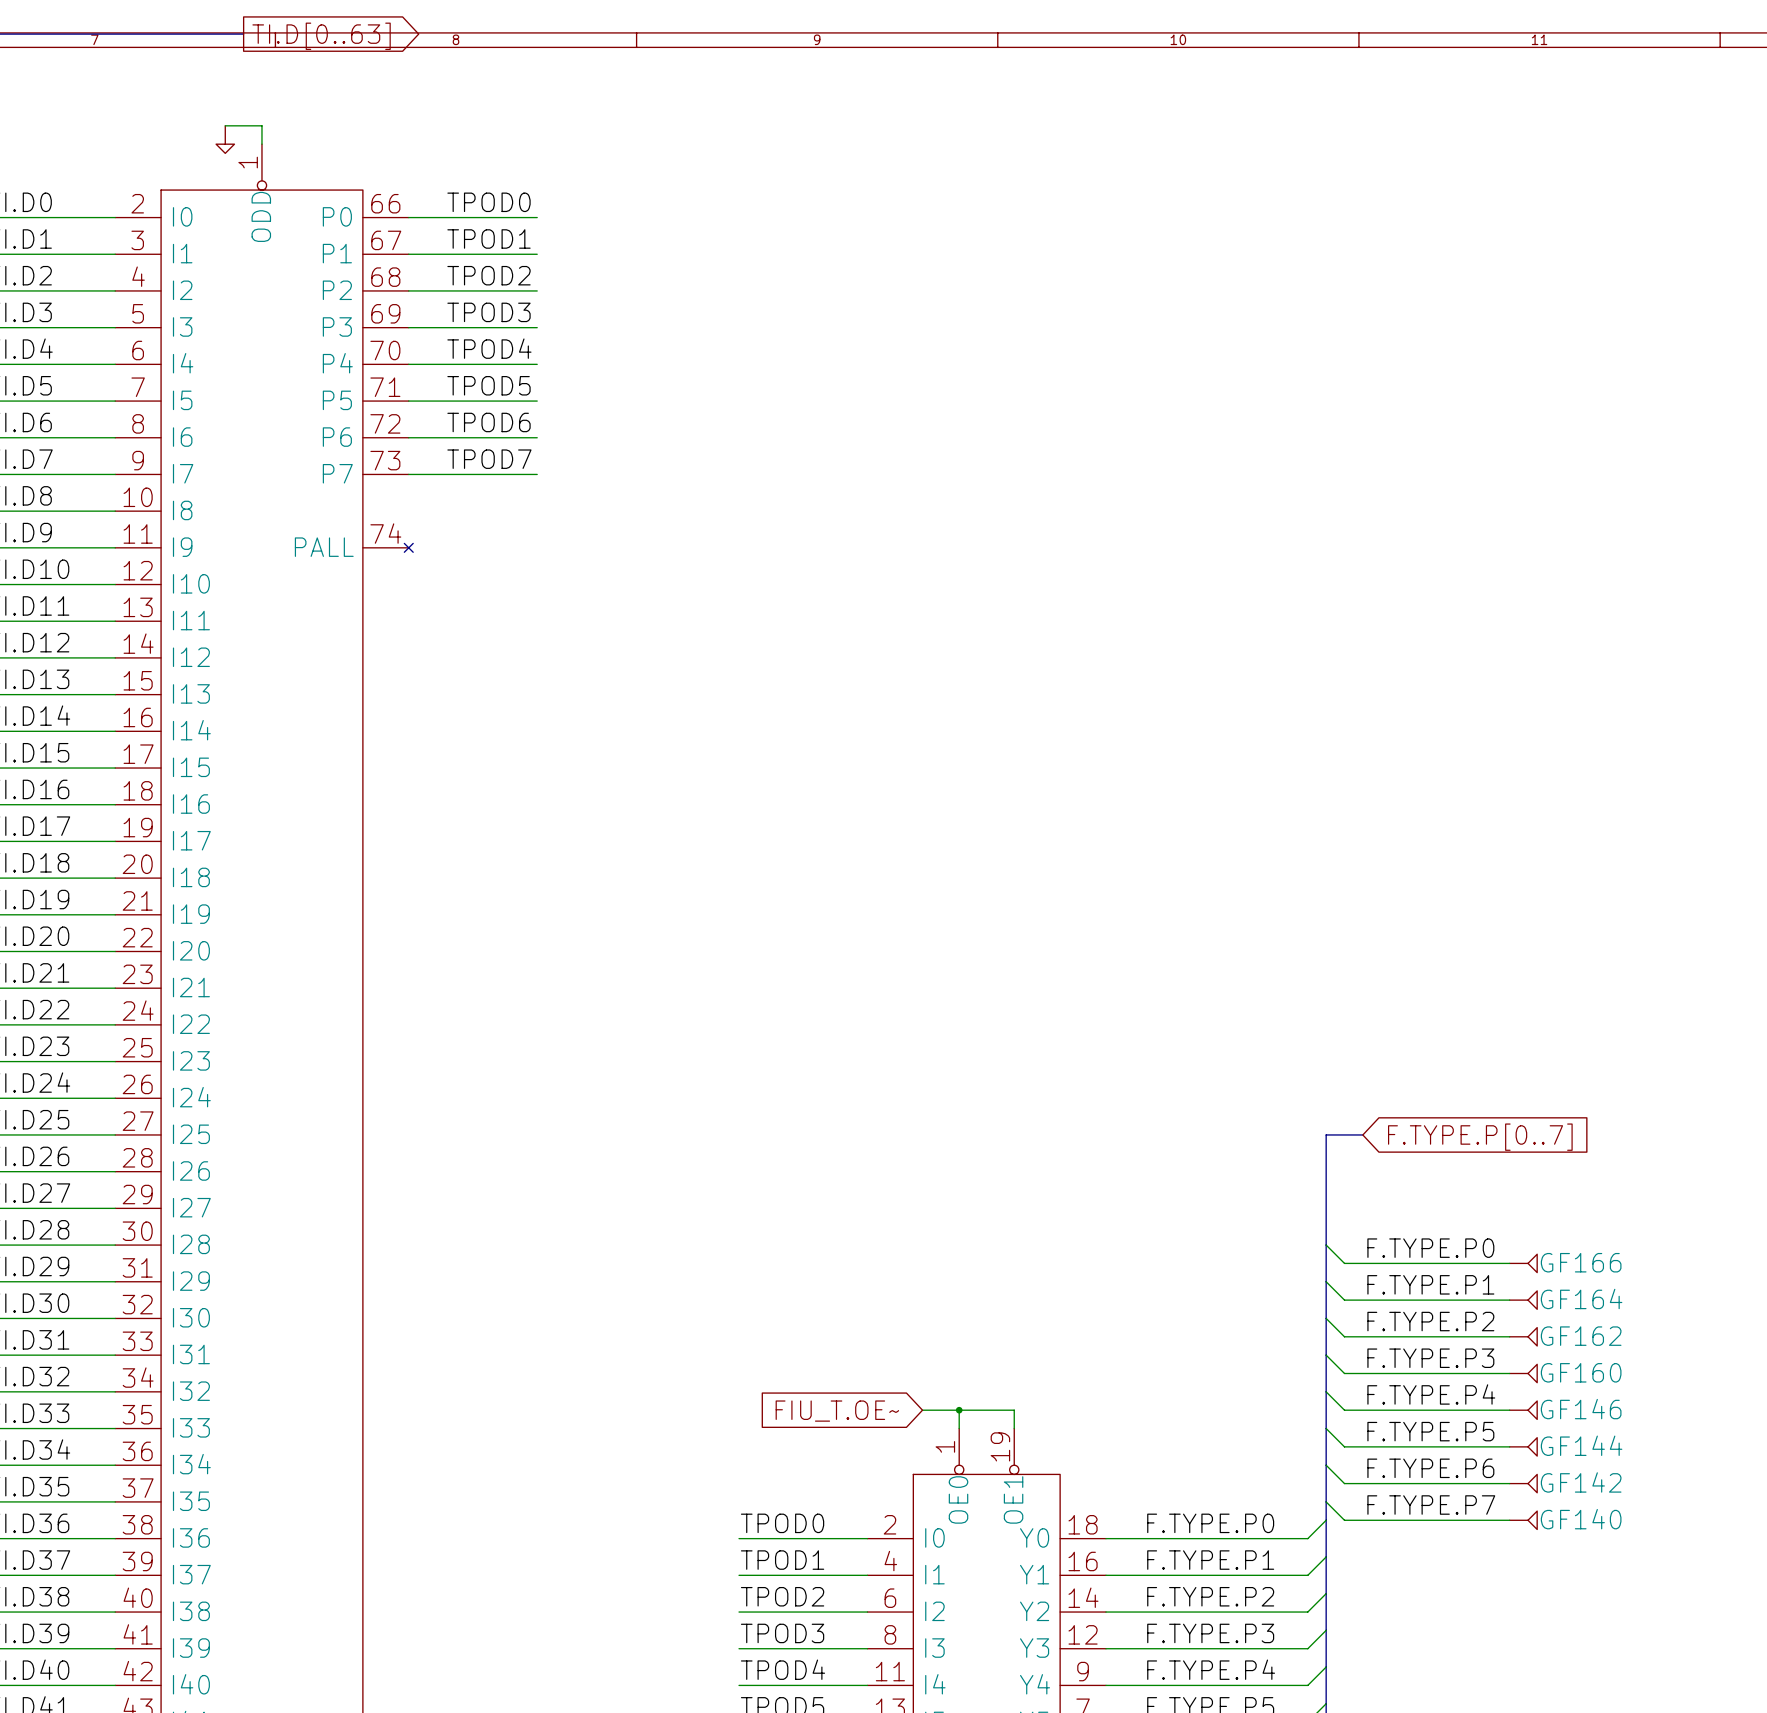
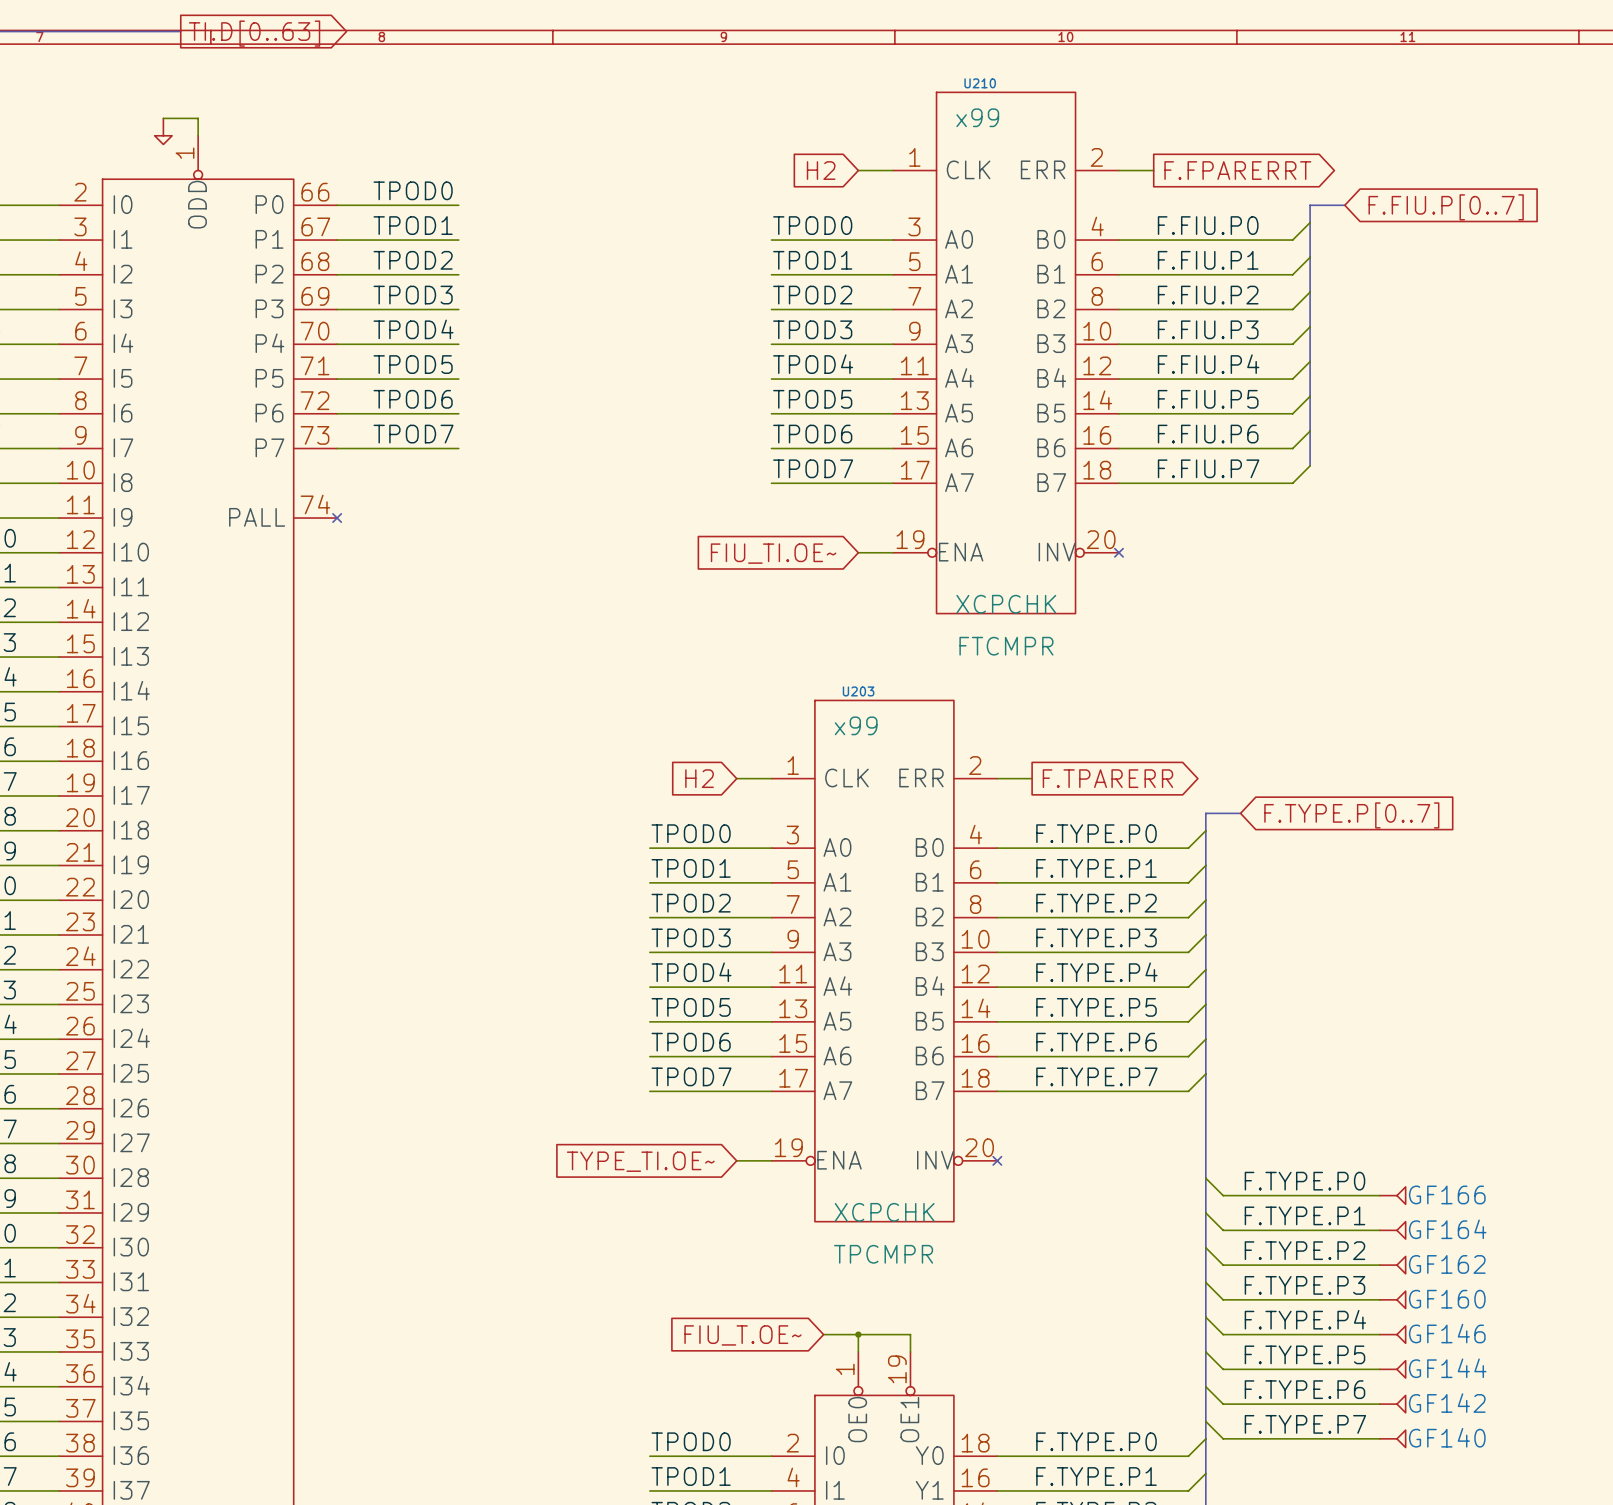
global label: none -> H2 (821, 170)
wire: none -> (858, 170) (893, 170)
wire: none -> (1118, 170) (1153, 170)
global label: none -> F.FPARERRT (1237, 170)
bus: none -> (1344, 205) (1310, 205) (1310, 465)
global label: none -> F.FIU.P[0..7] (1446, 207)
wire: none -> (1310, 222) (1292, 240) (1118, 240)
label: none -> TPOD0 (812, 225)
label: none -> F.FIU.P0 (1208, 225)
wire: none -> (771, 240) (893, 240)
wire: none -> (1310, 257) (1292, 274) (1118, 274)
label: none -> TPOD1 (812, 260)
label: none -> F.FIU.P1 (1208, 260)
wire: none -> (771, 274) (893, 274)
wire: none -> (1310, 292) (1292, 309) (1118, 309)
label: none -> TPOD2 (812, 295)
label: none -> F.FIU.P2 (1208, 295)
wire: none -> (771, 309) (893, 309)
wire: none -> (1310, 326) (1292, 344) (1118, 344)
label: none -> TPOD3 (812, 329)
label: none -> F.FIU.P3 (1208, 329)
wire: none -> (771, 344) (893, 344)
U210: none -> XCPCHK (1006, 352)
wire: none -> (1310, 361) (1292, 379) (1118, 379)
label: none -> TPOD4 (813, 364)
label: none -> F.FIU.P4 (1208, 364)
wire: none -> (771, 379) (893, 379)
wire: none -> (1310, 396) (1292, 413) (1118, 413)
label: none -> TPOD5 (812, 399)
label: none -> F.FIU.P5 (1208, 399)
wire: none -> (771, 413) (893, 413)
wire: none -> (1310, 431) (1292, 448) (1118, 448)
label: none -> TPOD6 (812, 434)
label: none -> F.FIU.P6 (1208, 434)
wire: none -> (771, 448) (893, 448)
wire: none -> (1310, 465) (1292, 483) (1118, 483)
label: none -> TPOD7 (813, 468)
label: none -> F.FIU.P7 (1208, 468)
wire: none -> (771, 483) (893, 483)
wire: none -> (858, 552) (893, 552)
no-connect mark: none -> (1118, 552)
global label: none -> FIU_TI.OE~ (773, 553)
global label: none -> H2 (699, 778)
wire: none -> (736, 778) (771, 778)
wire: none -> (997, 778) (1032, 778)
global label: none -> F.TPARERR (1107, 778)
global label: none -> F.TYPE.P[0..7] (1351, 815)
wire: none -> (1205, 830) (1188, 848) (997, 848)
label: none -> TPOD0 (691, 833)
label: none -> F.TYPE.P0 (1096, 833)
wire: none -> (649, 848) (771, 848)
wire: none -> (1205, 865) (1188, 882) (997, 882)
label: none -> TPOD1 (691, 868)
label: none -> F.TYPE.P1 (1096, 868)
wire: none -> (649, 882) (771, 882)
wire: none -> (1205, 900) (1188, 917) (997, 917)
label: none -> TPOD2 (691, 903)
label: none -> F.TYPE.P2 (1096, 903)
wire: none -> (649, 917) (771, 917)
wire: none -> (1205, 935) (1188, 952) (997, 952)
label: none -> TPOD3 (691, 937)
label: none -> F.TYPE.P3 (1096, 937)
wire: none -> (649, 952) (771, 952)
U203: none -> XCPCHK (884, 961)
wire: none -> (1205, 969) (1188, 987) (997, 987)
label: none -> TPOD4 (691, 972)
label: none -> F.TYPE.P4 (1096, 972)
wire: none -> (649, 987) (771, 987)
wire: none -> (1205, 1004) (1188, 1021) (997, 1021)
label: none -> TPOD5 (691, 1007)
label: none -> F.TYPE.P5 (1096, 1007)
wire: none -> (649, 1021) (771, 1021)
wire: none -> (1205, 1039) (1188, 1056) (997, 1056)
label: none -> TPOD6 (691, 1042)
label: none -> F.TYPE.P6 (1096, 1042)
wire: none -> (649, 1056) (771, 1056)
wire: none -> (1205, 1073) (1188, 1091) (997, 1091)
bus: (1326, 1134) (1362, 1134) -> (1205, 1073) (1205, 813) (1240, 813)
global label: F.TYPE.P[0..7] (1480, 1137) -> none
label: none -> TPOD7 (691, 1076)
label: none -> F.TYPE.P7 (1096, 1076)
wire: none -> (649, 1091) (771, 1091)
wire: none -> (736, 1160) (771, 1160)
no-connect mark: none -> (997, 1160)
global label: none -> TYPE_TI.OE~ (640, 1161)

